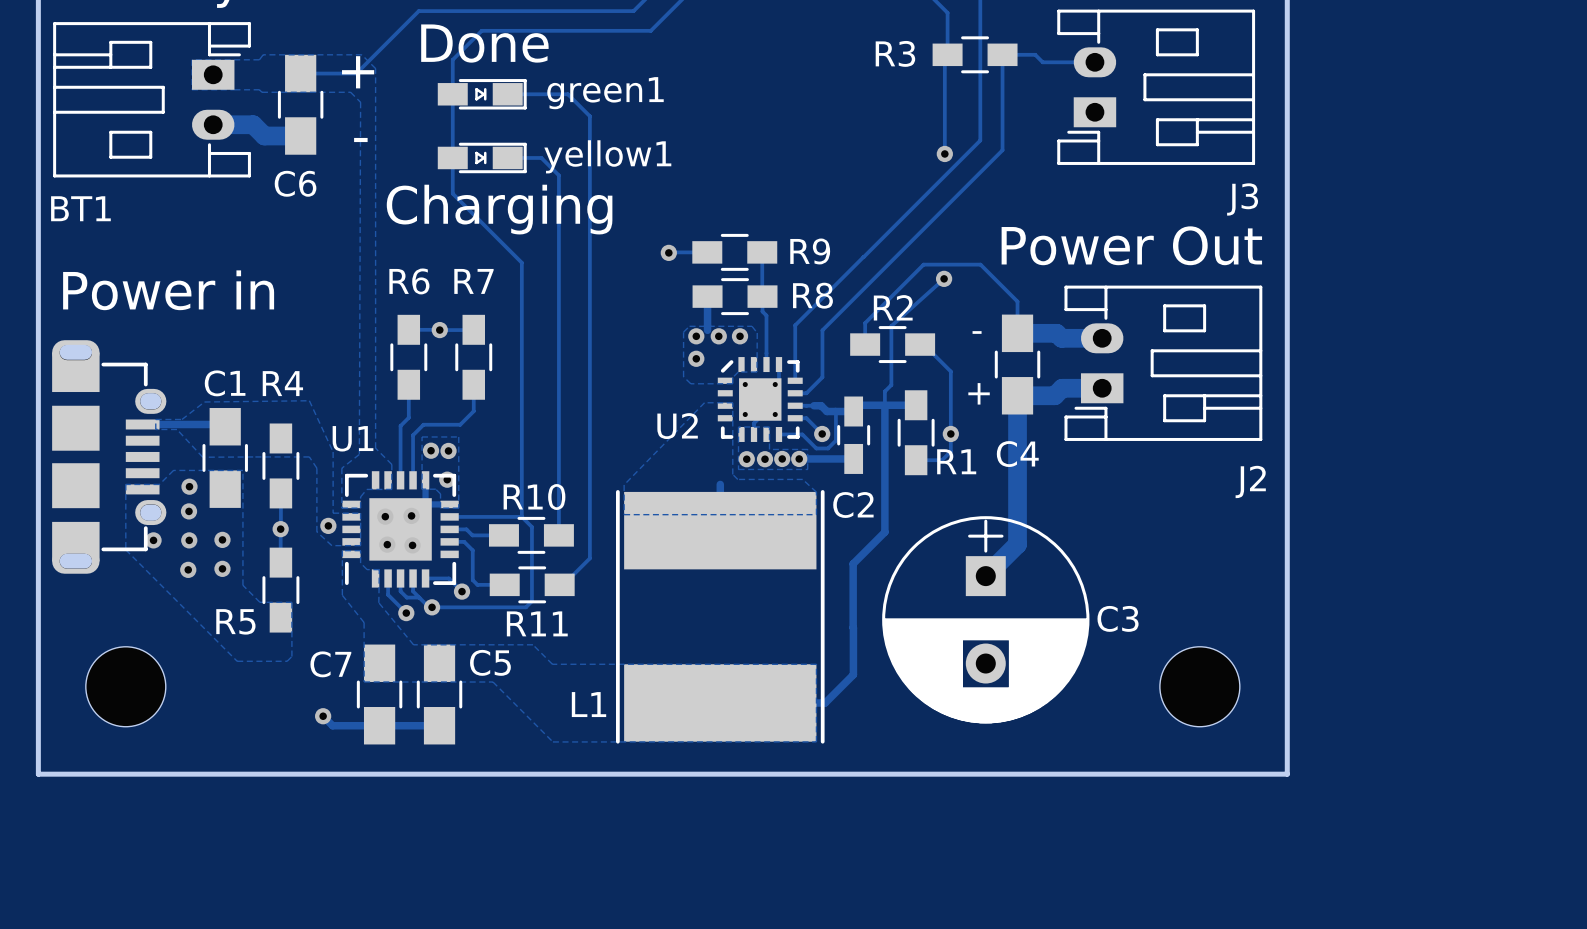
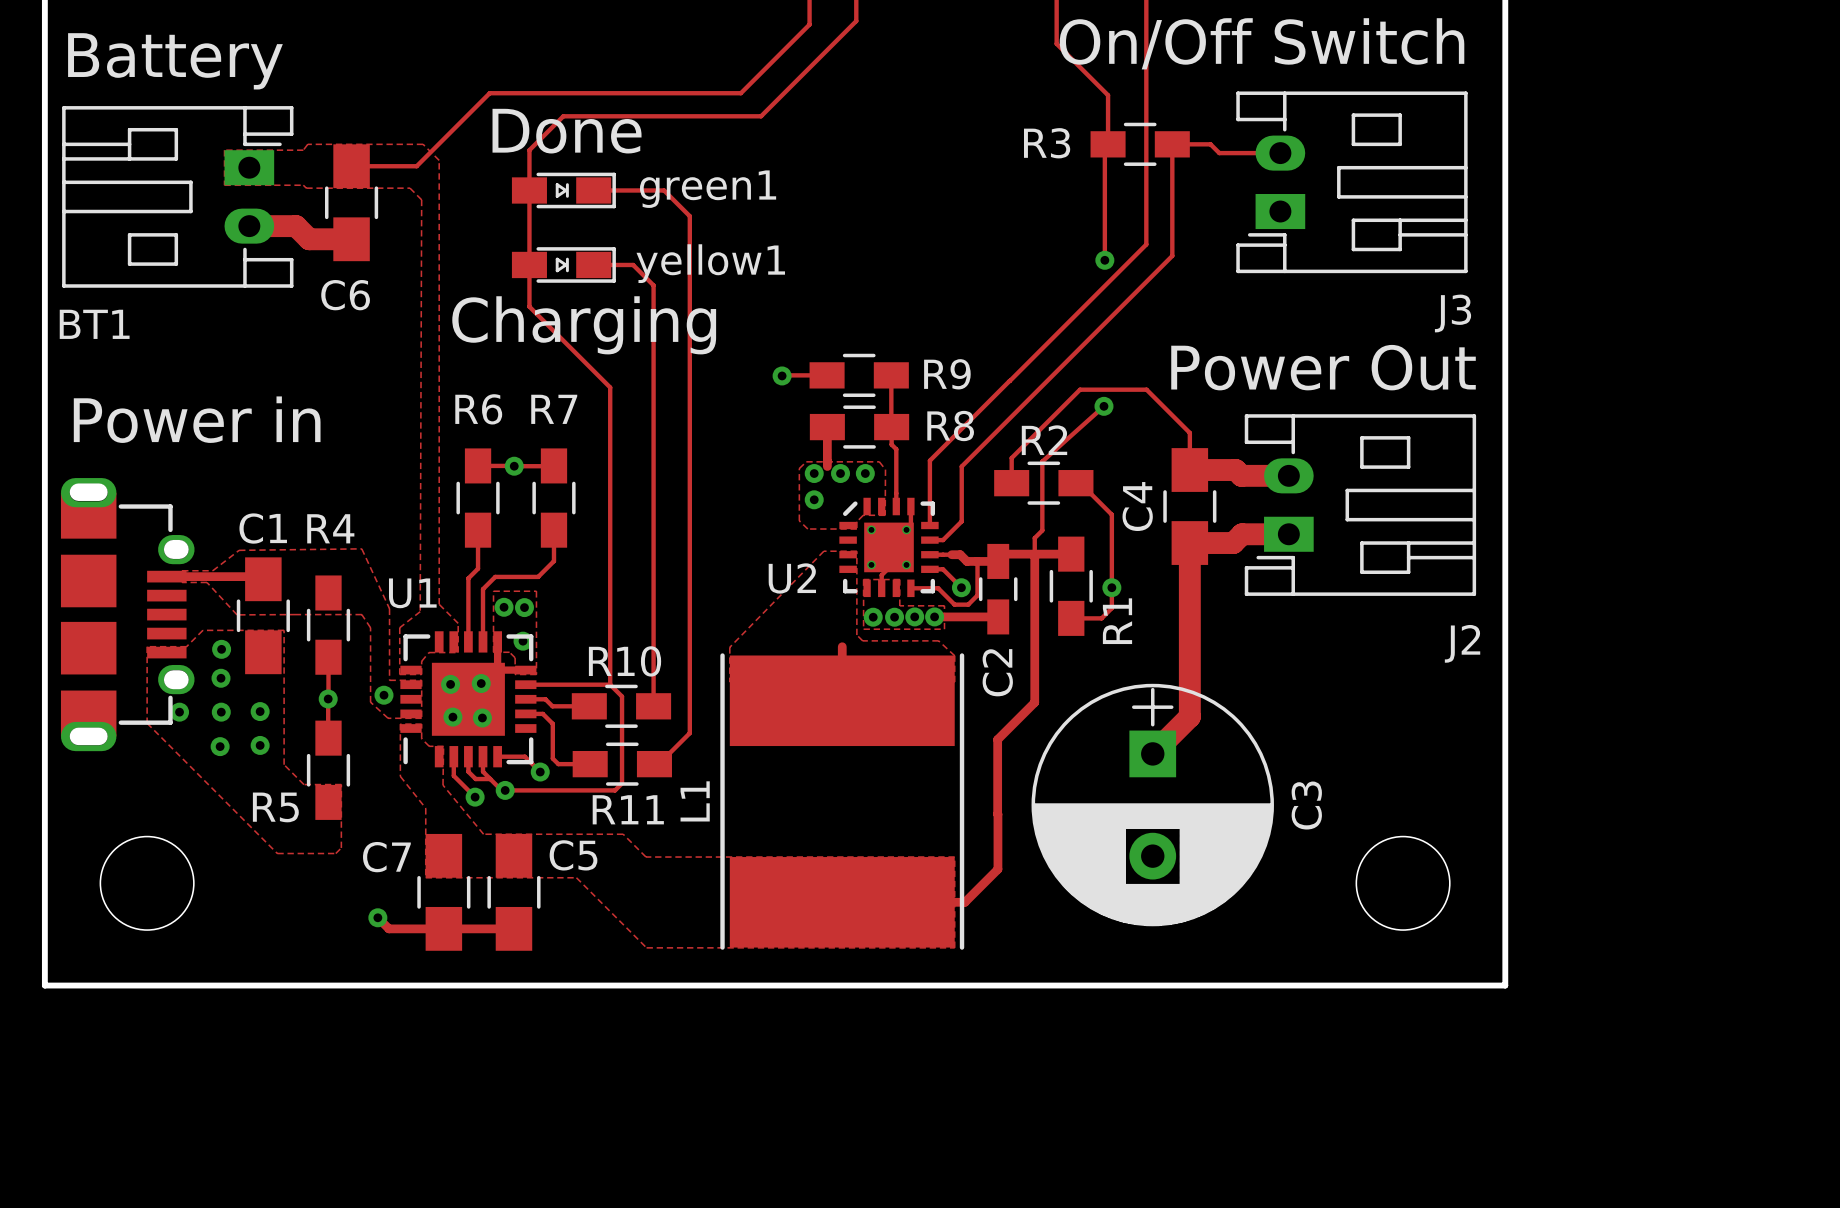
text: + (358, 72) -> none
text: - (360, 140) -> none
text: - (977, 332) -> none
text: + (979, 393) -> none
C4 name rotation: 0° (1017, 454) -> 90° counterclockwise (1137, 506)
C4 name position: C4 (1017, 454) -> C4 (1137, 506)
R1 name rotation: 0° (956, 461) -> 90° counterclockwise (1117, 621)
C2 name rotation: 0° (853, 505) -> 90° counterclockwise (997, 672)
C3 name rotation: 0° (1118, 618) -> 90° counterclockwise (1306, 805)
L1 name rotation: 0° (589, 704) -> 90° counterclockwise (695, 801)
L1 name position: L1 (589, 704) -> L1 (695, 801)

